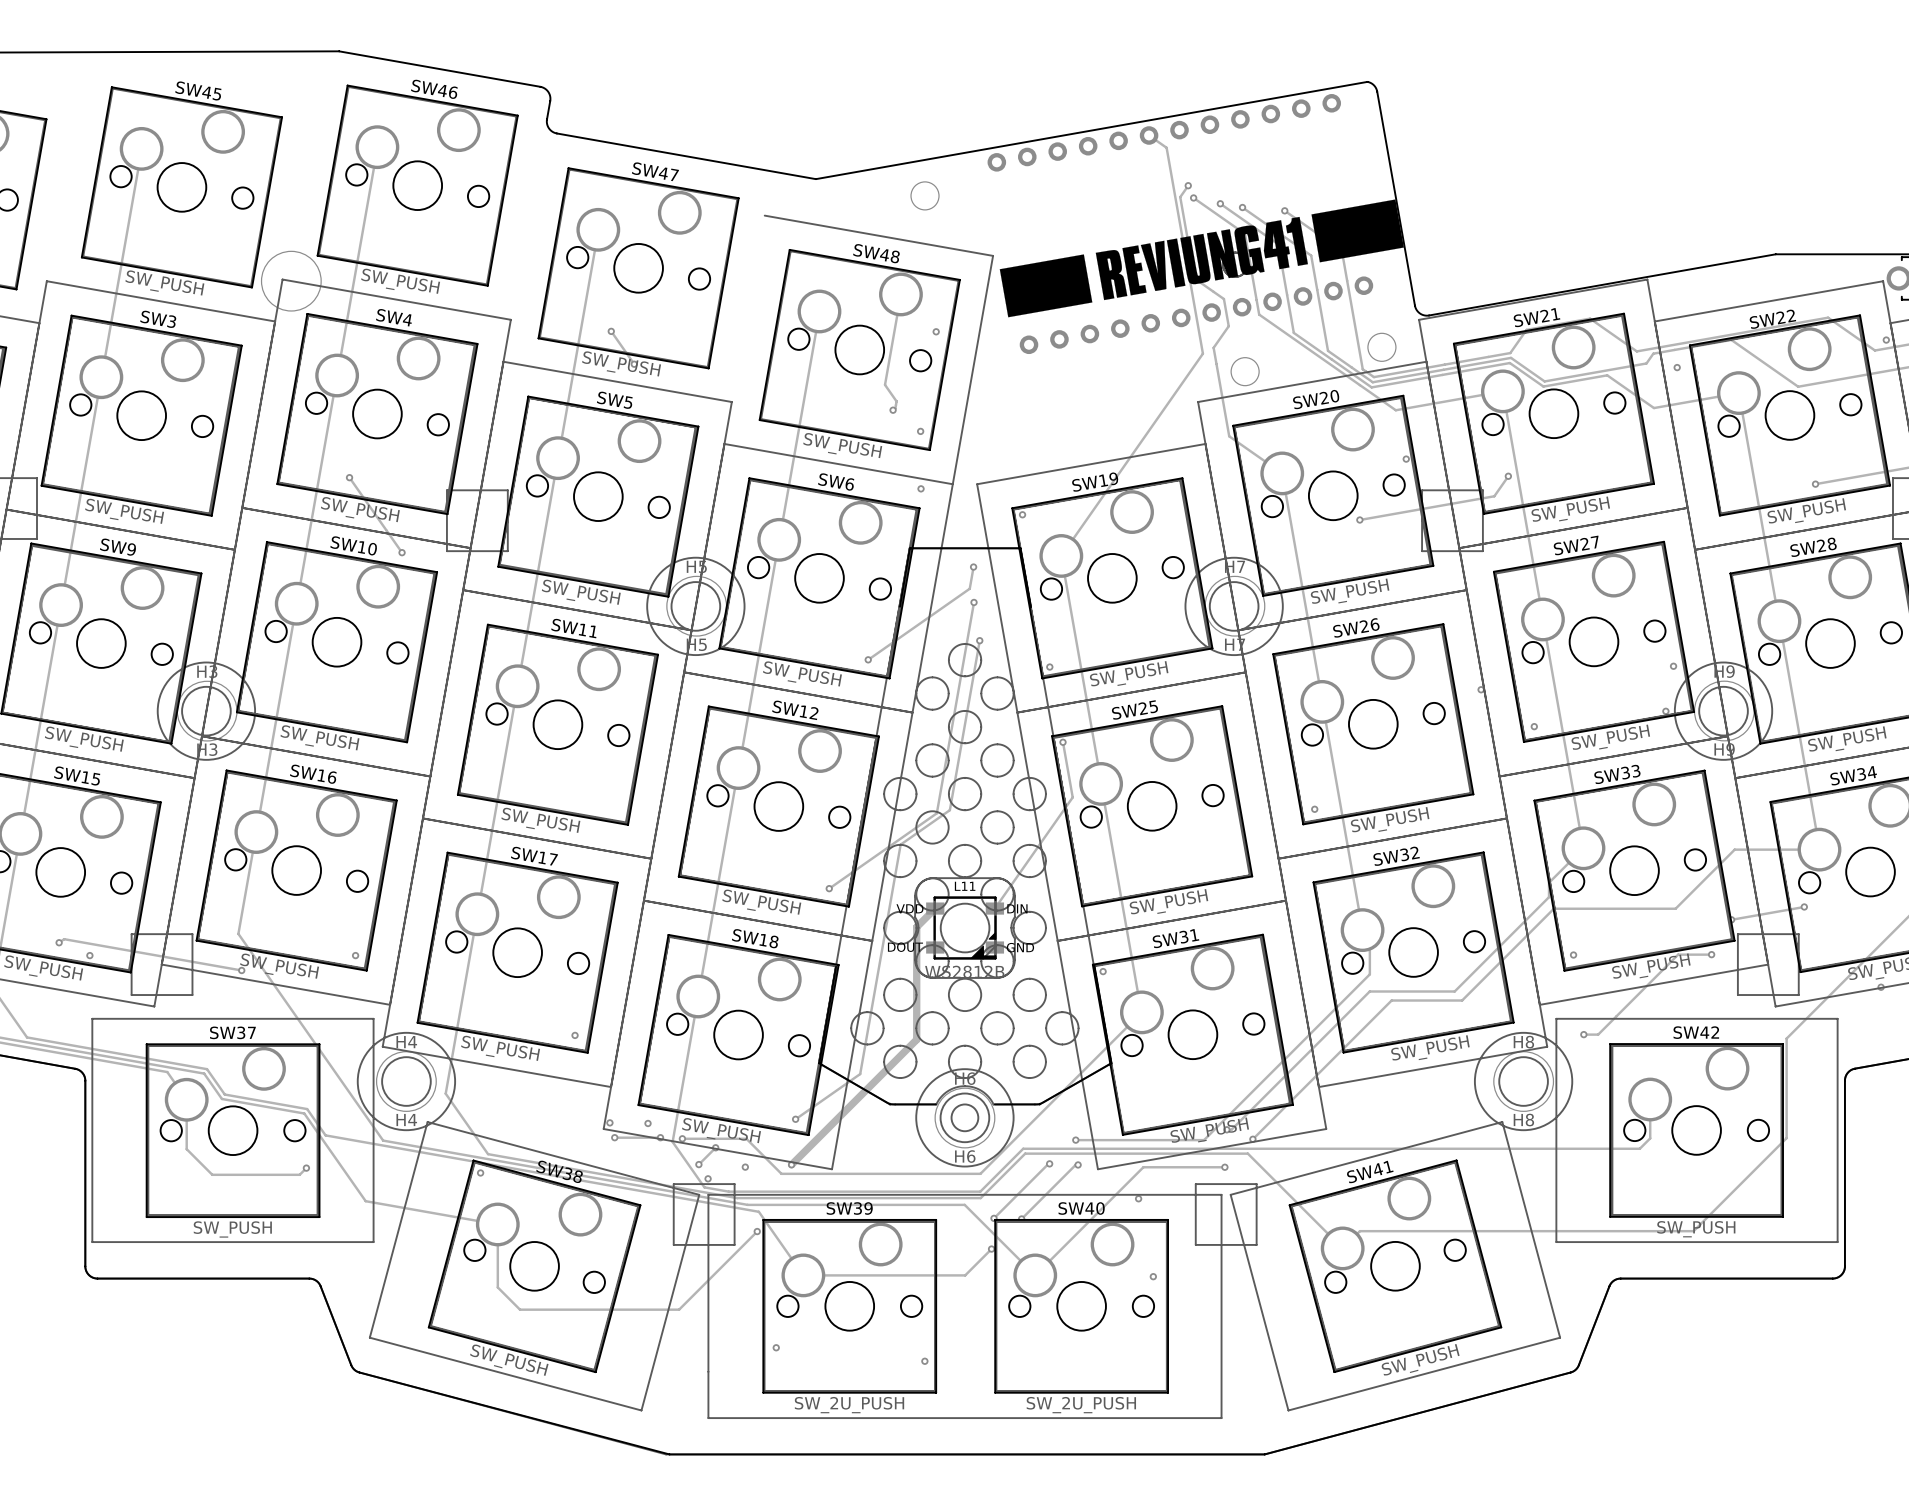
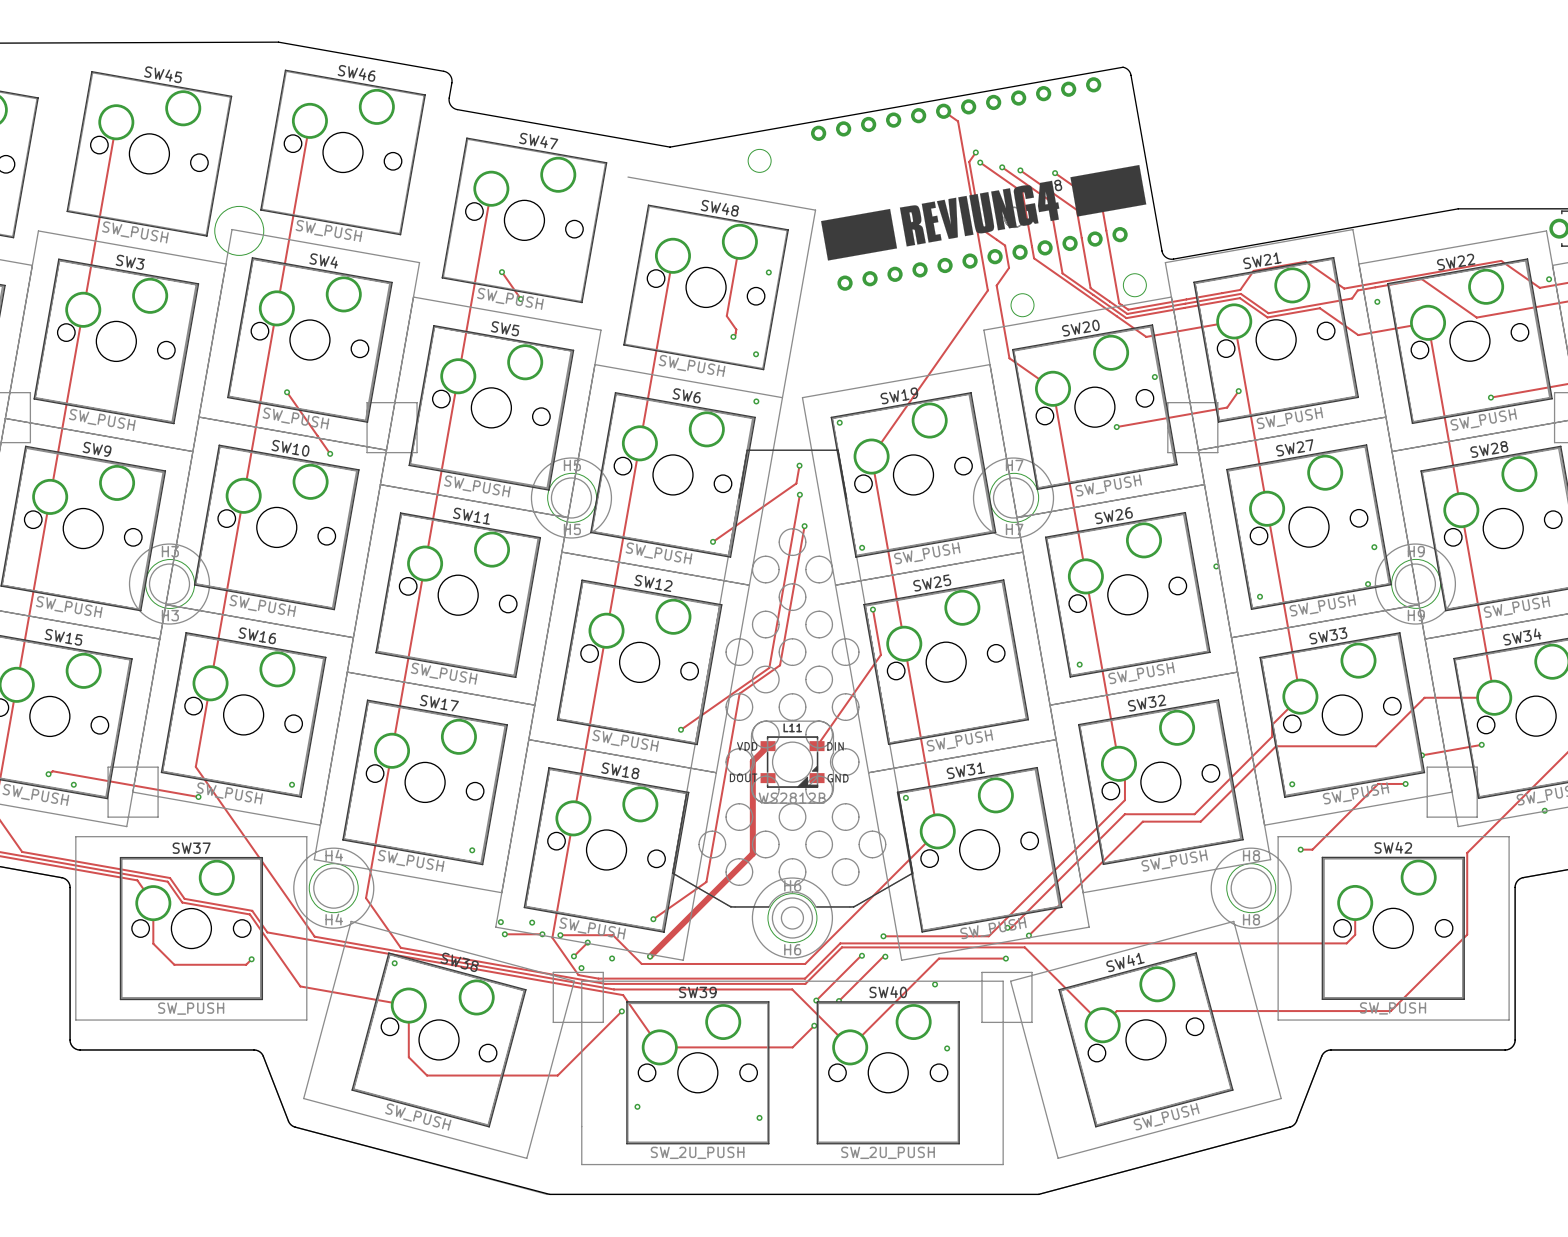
drawing shape: [999, 199, 1404, 318] -> [821, 164, 1147, 261]

